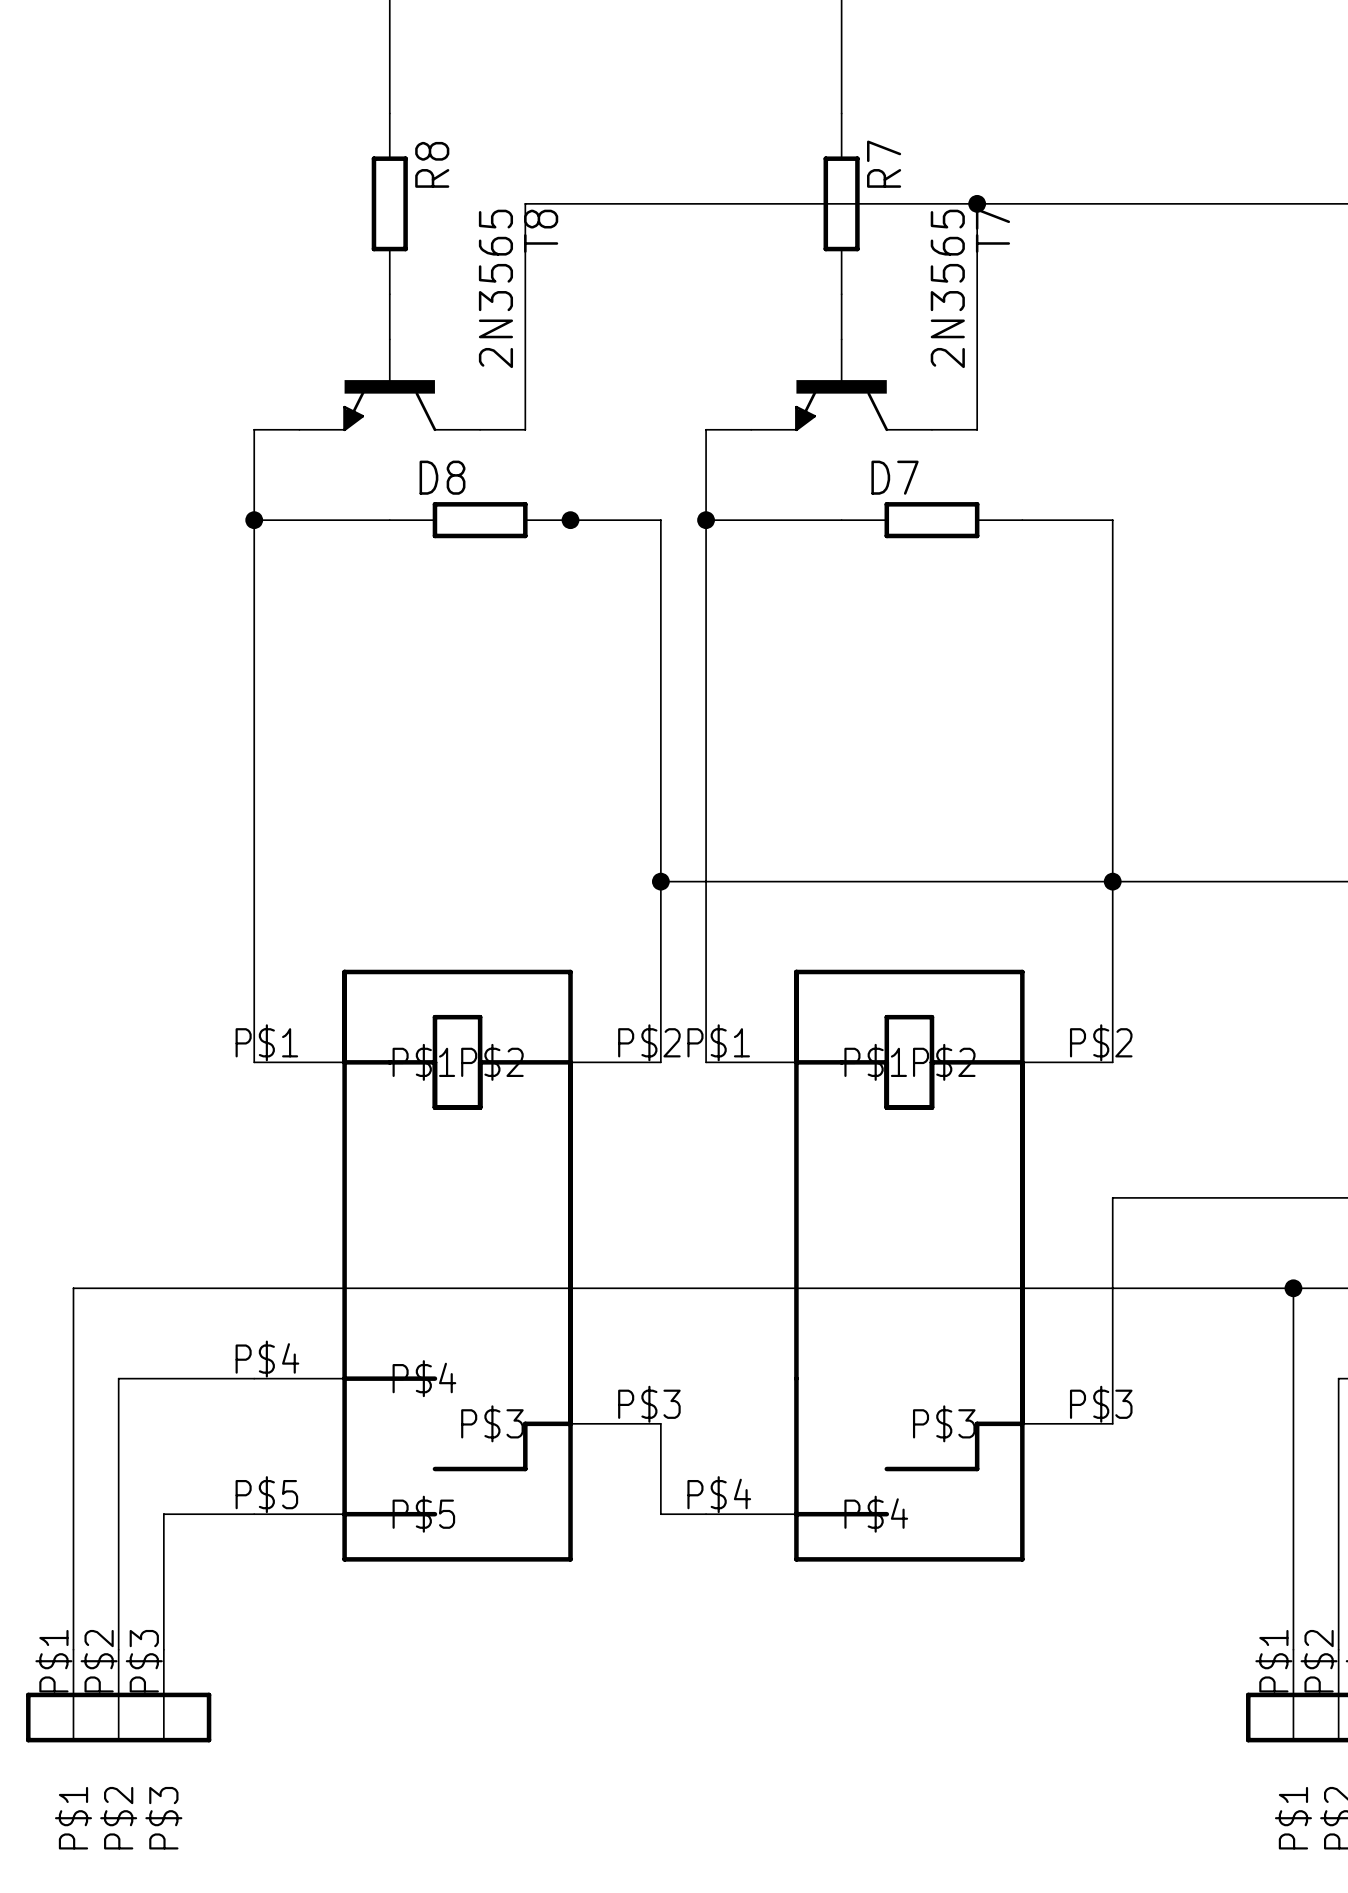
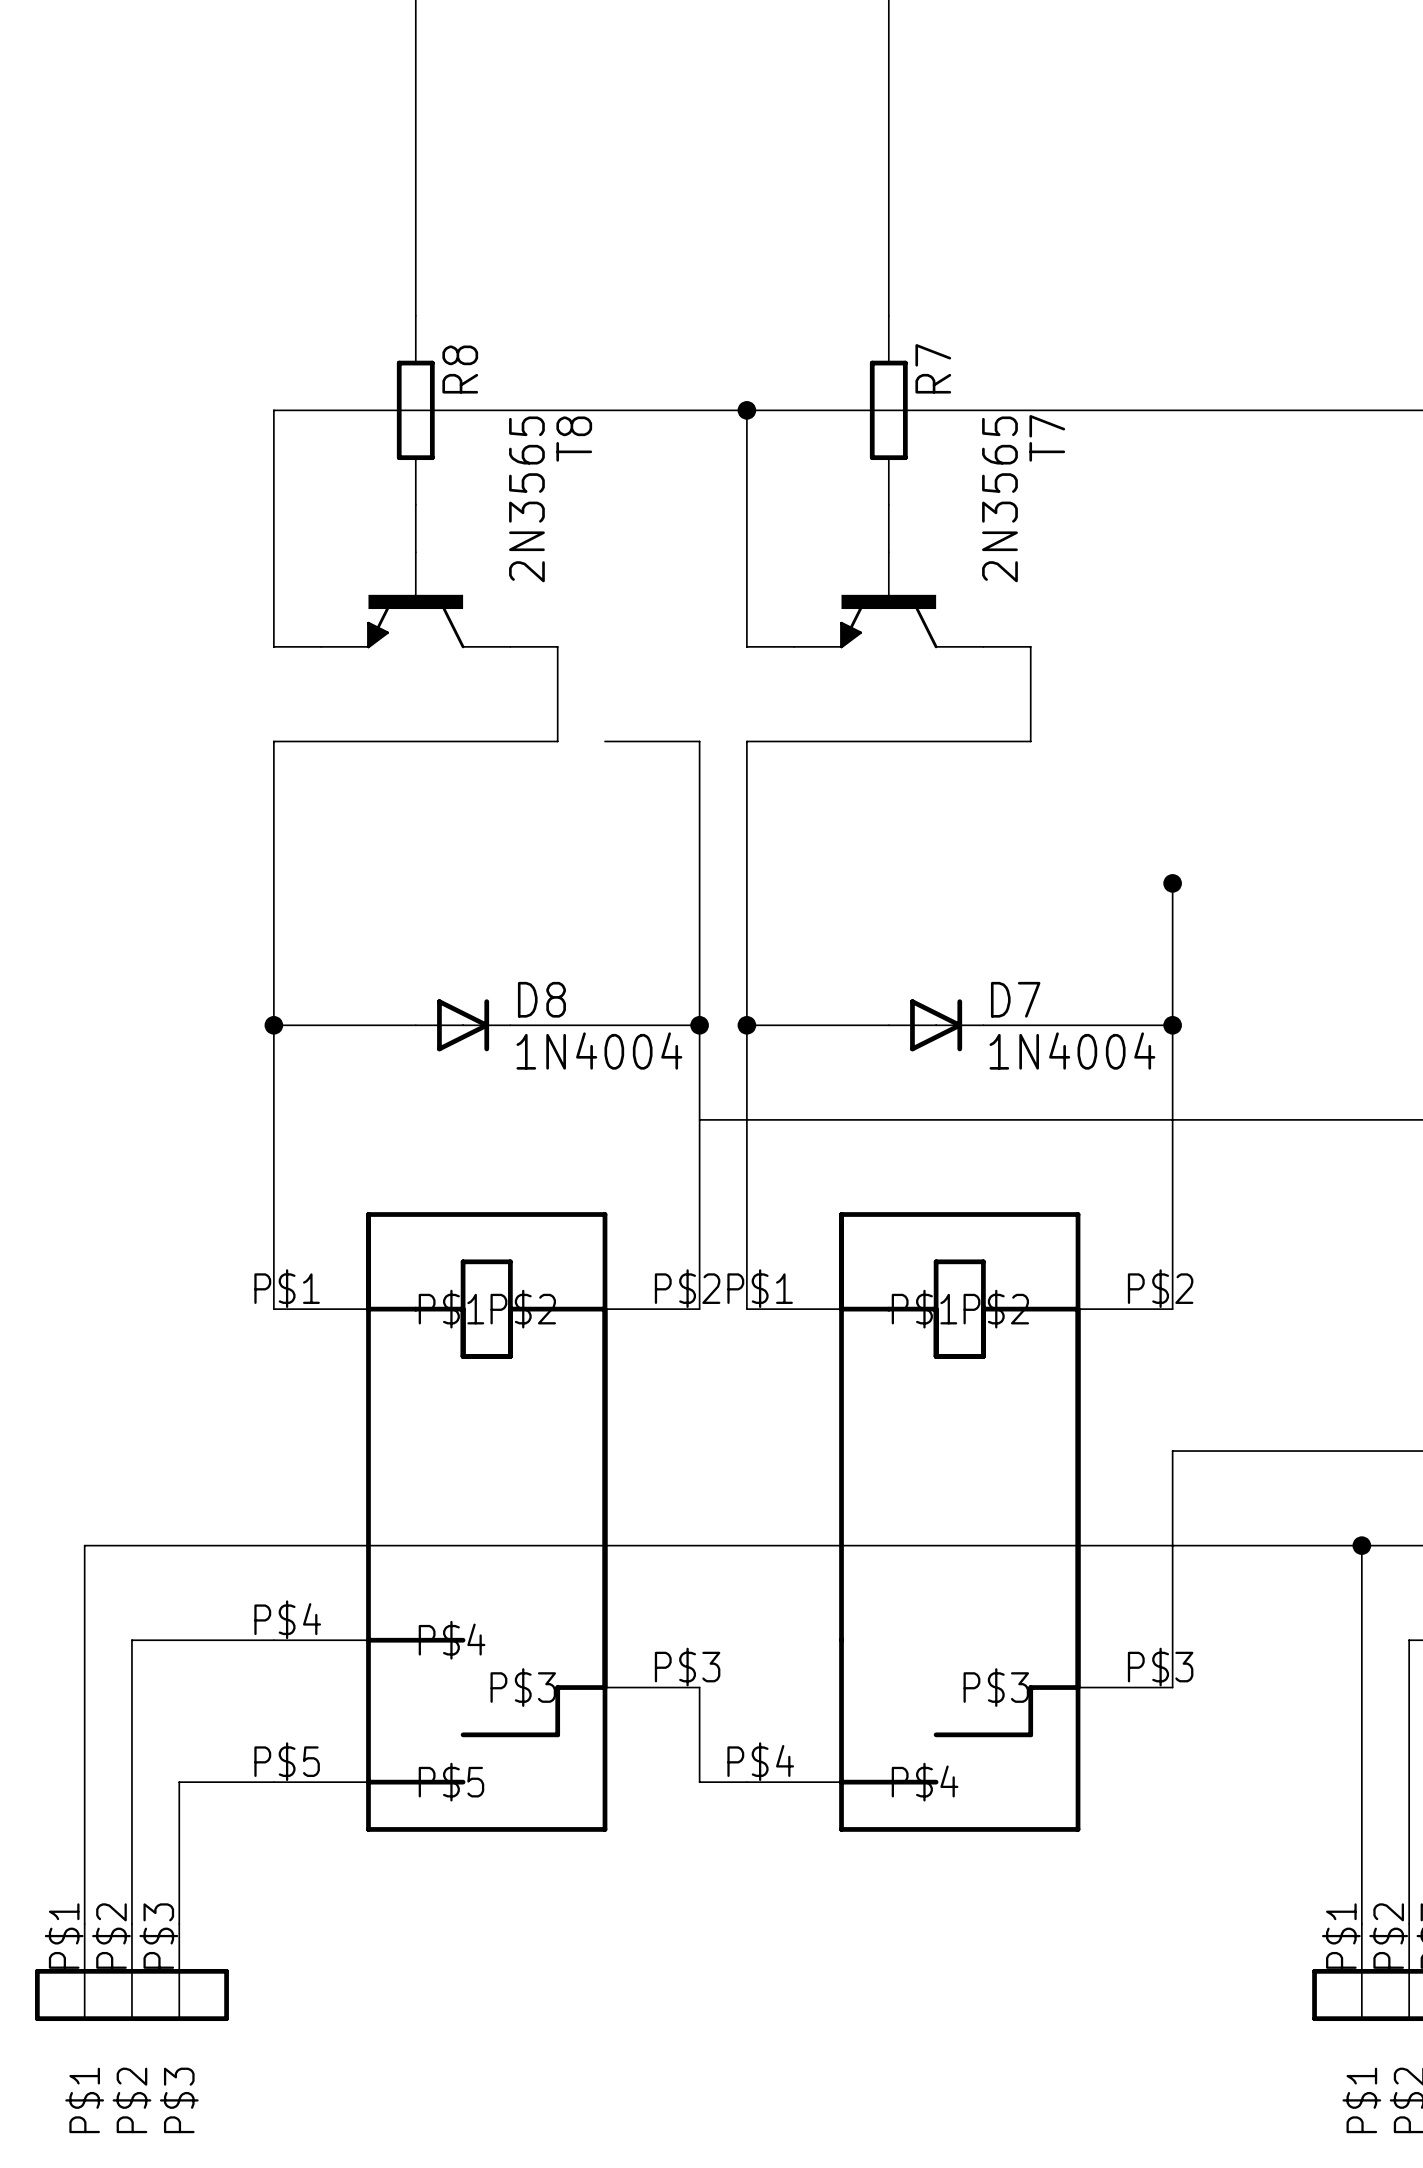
wire: (525, 203) (525, 429) -> (557, 410) (273, 410) (273, 646)
junction: none -> (746, 410)
wire: (977, 203) (977, 429) -> (888, 741) (1030, 741) (1030, 646)
junction: (977, 203) -> none
wire: (254, 429) (254, 520) -> none
wire: none -> (557, 646) (557, 741) (415, 741)
wire: (706, 429) (706, 520) -> (746, 646) (746, 410)
D8 name position: D8 (442, 477) -> D8 (541, 999)
D7 name position: D7 (895, 477) -> D7 (1015, 999)
D8 symbol: [389, 502, 571, 539] -> [415, 999, 511, 1052]
D7 symbol: [841, 502, 1023, 539] -> [888, 999, 984, 1052]
junction: (254, 520) -> none
junction: (570, 520) -> none
junction: (706, 520) -> none
wire: (1022, 520) (1112, 520) (1112, 655) -> none
junction: none -> (1172, 883)
wire: none -> (273, 1025) (415, 1025)
junction: none -> (273, 1025)
wire: none -> (510, 1025) (699, 1025)
junction: none -> (699, 1025)
wire: none -> (746, 1025) (888, 1025)
junction: none -> (746, 1025)
wire: none -> (983, 1025) (1172, 1025)
D8 value: none -> 1N4004 (599, 1051)
D7 value: none -> 1N4004 (1072, 1051)
junction: (660, 881) -> none
junction position: (1112, 881) -> (1172, 1025)

